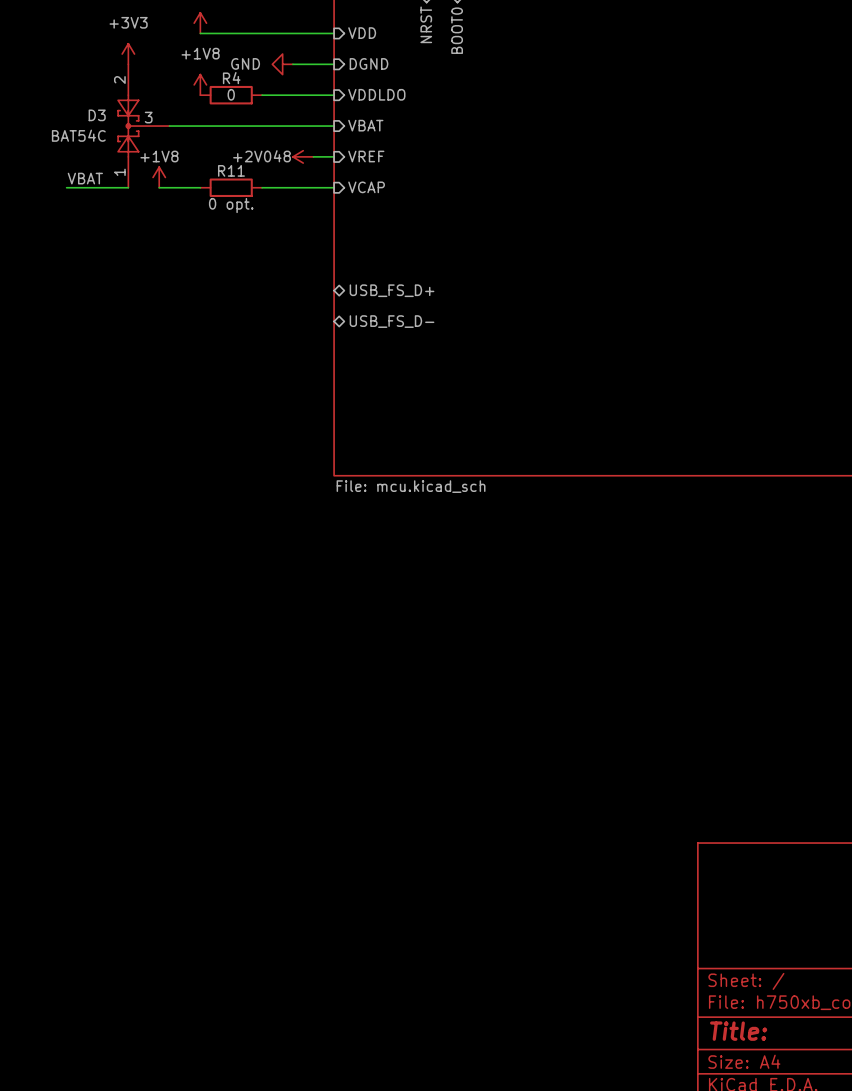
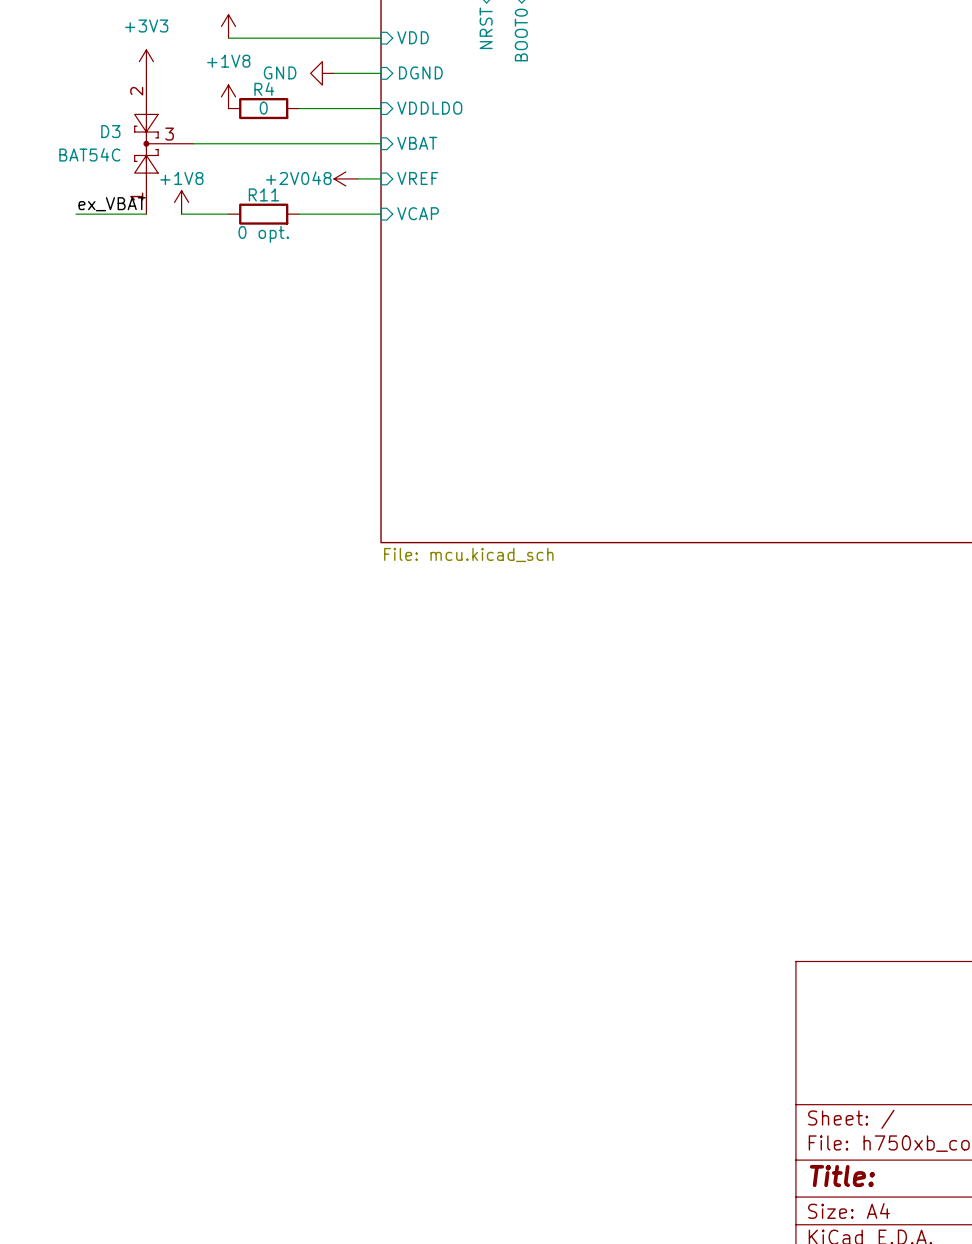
label: VBAT (85, 178) -> ex_VBAT (112, 204)
sheet pin: USB_FS_D+ (392, 290) -> none
sheet pin: USB_FS_D- (392, 321) -> none

